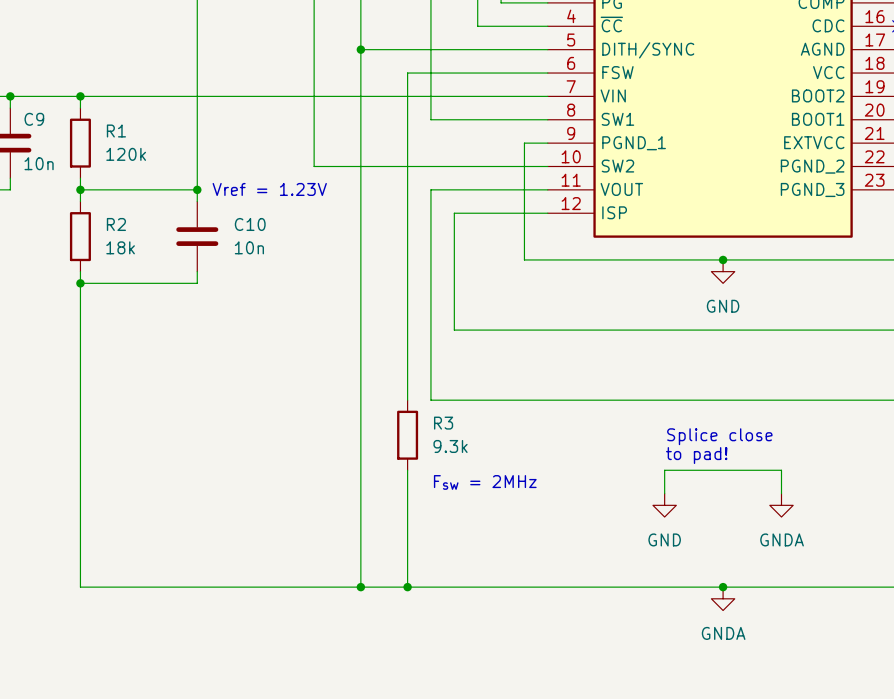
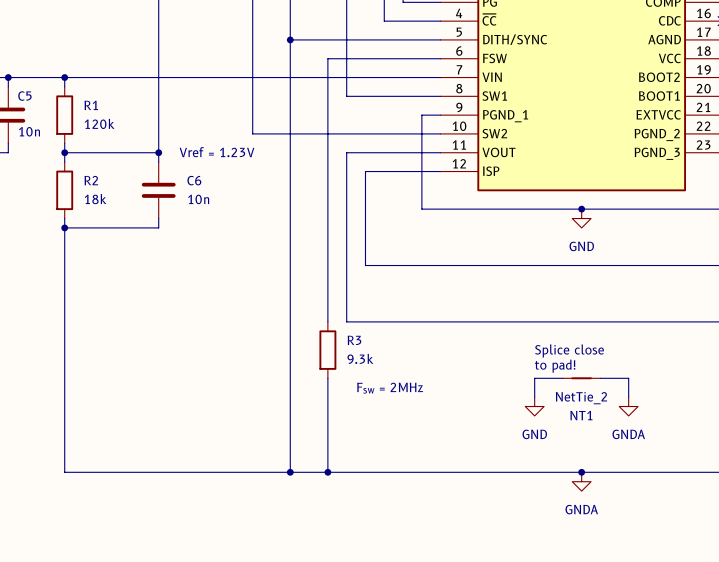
C9 name: C9 (34, 119) -> C5 (24, 96)
C10 name: C10 (250, 224) -> C6 (194, 180)
NT1: none -> NetTie_2 (581, 378)

